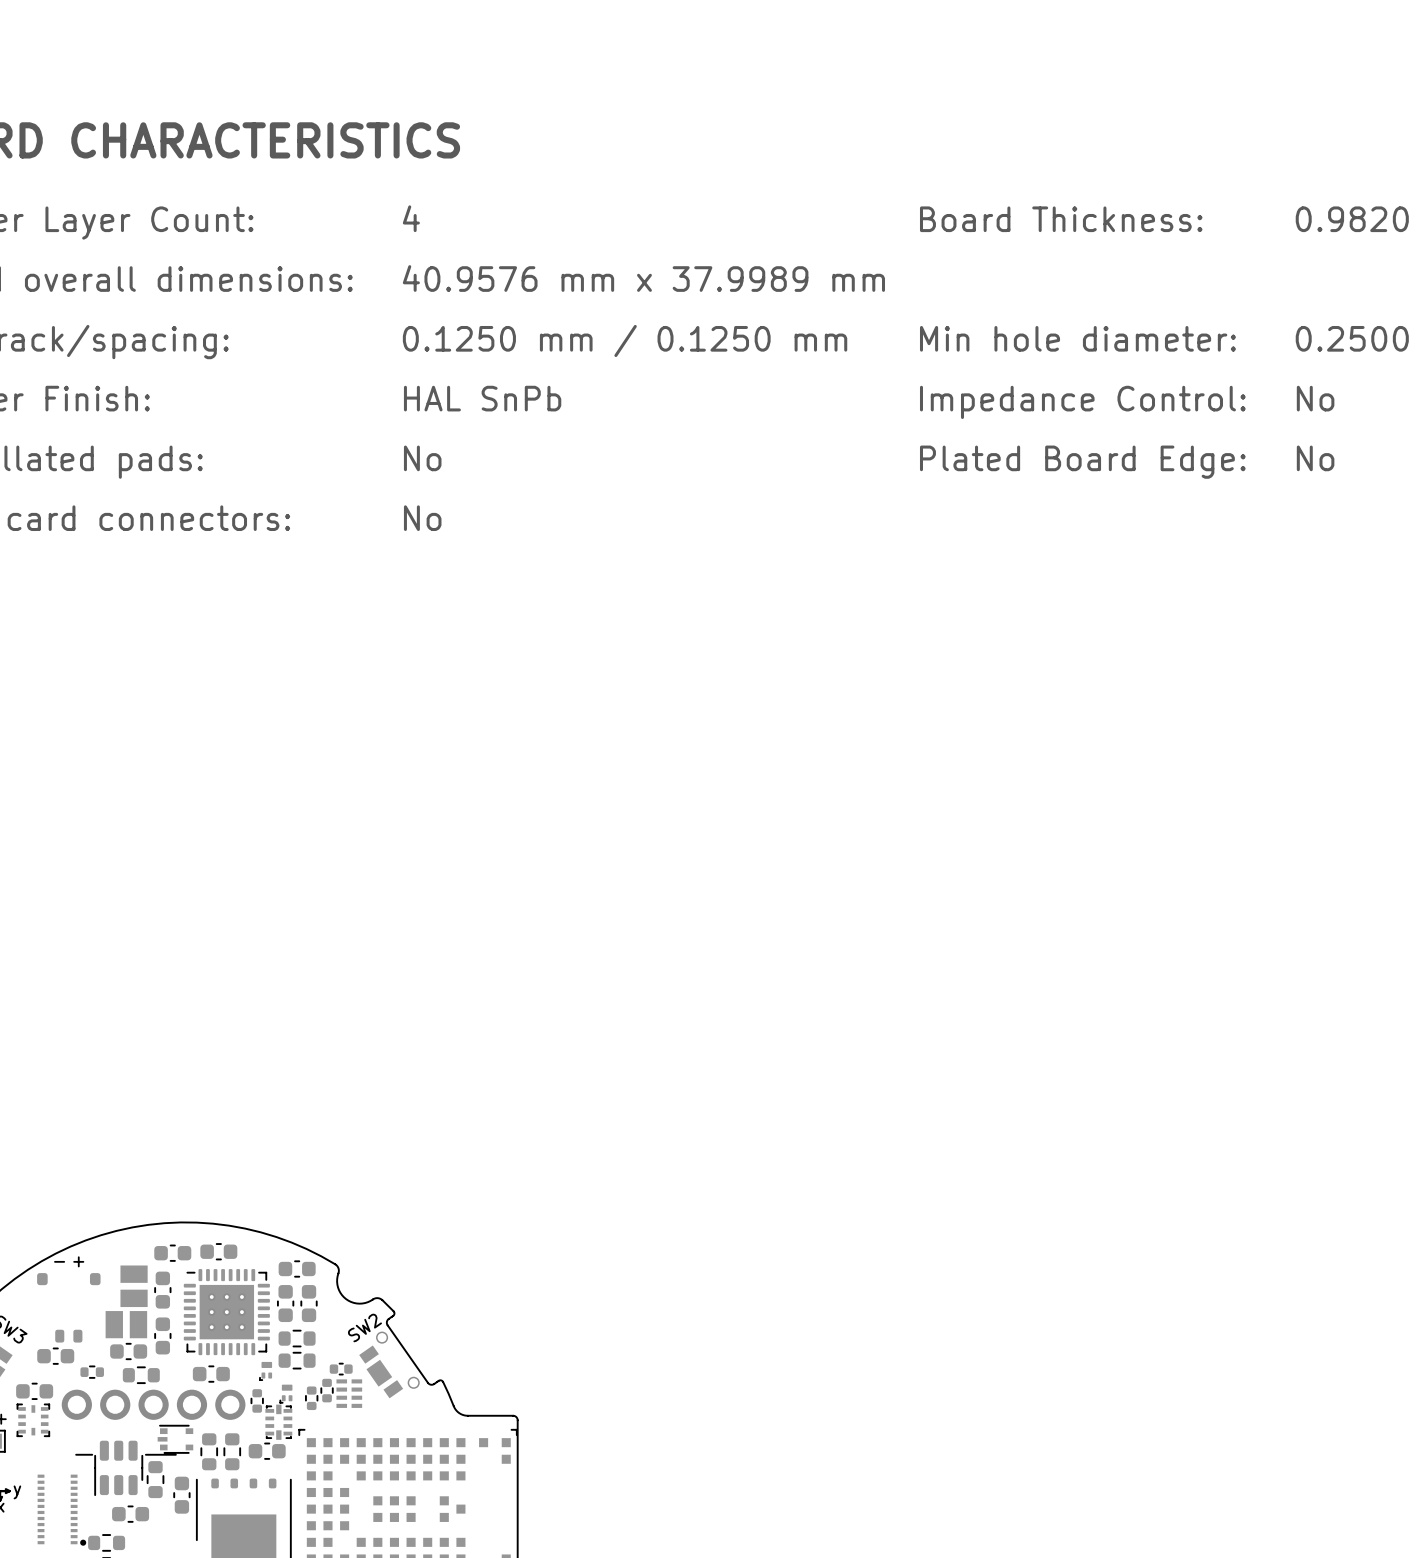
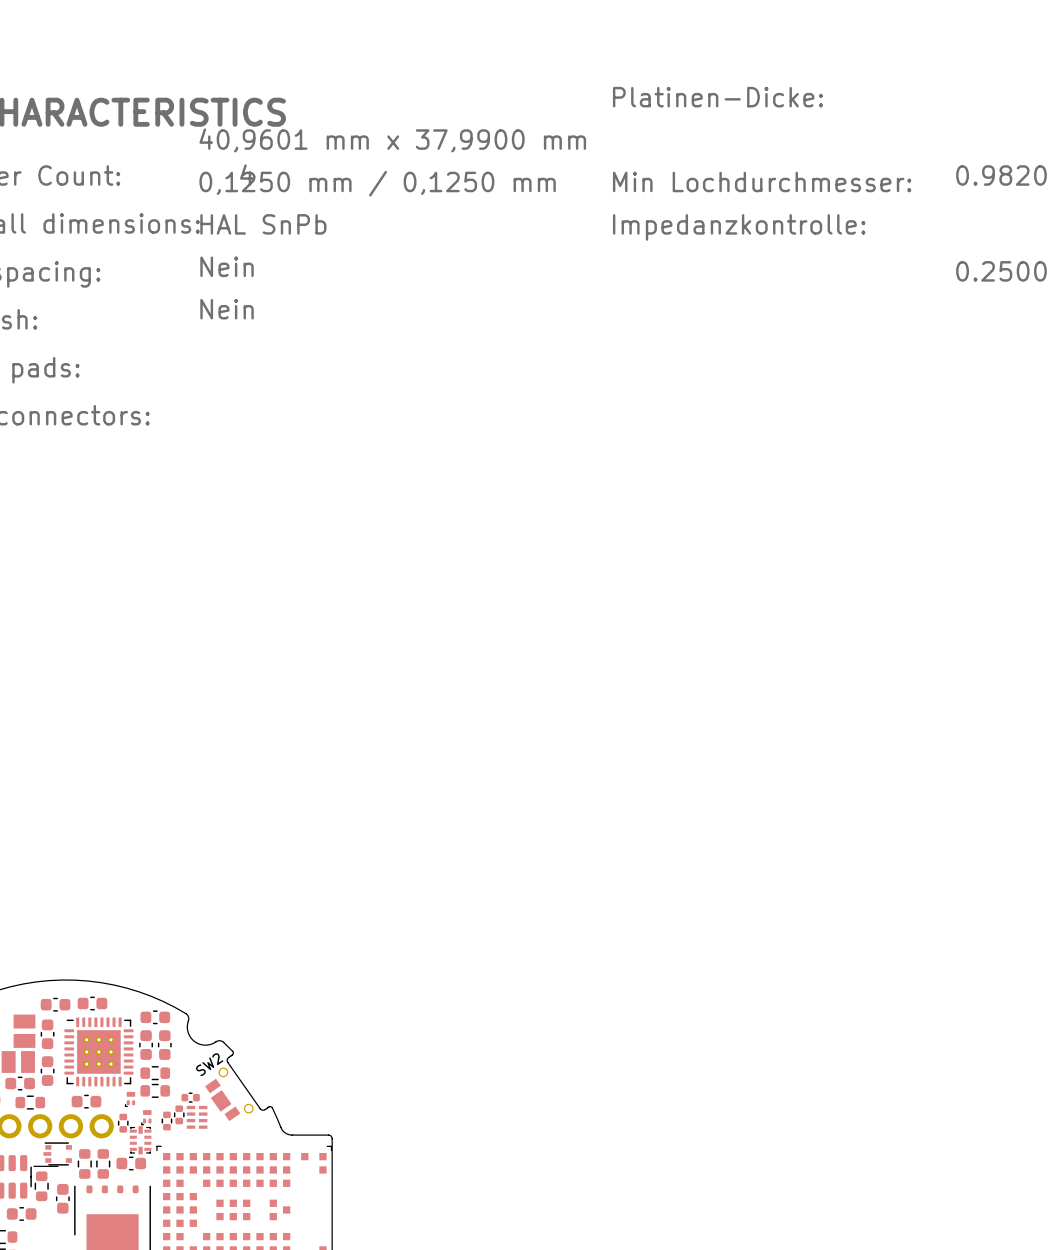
text: none -> Platinen-Dicke: (718, 97)
text: none -> 40,9601 mm x 37,9900 mm (392, 140)
text: Board Thickness: (1061, 219) -> none
text: none -> Min Lochdurchmesser: (762, 181)
text: none -> 0,1250 mm / 0,1250 mm (377, 183)
text: 40.9576 mm x 37.9989 mm (643, 278) -> none
text: none -> Impedanzkontrolle: (739, 227)
text: none -> Nein (227, 266)
text: Min hole diameter: (1077, 338) -> none
text: 0.1250 mm / 0.1250 mm (625, 340) -> none
text: none -> Nein (227, 309)
text position: HAL SnPb (482, 398) -> HAL SnPb (263, 224)
text: No (1315, 398) -> none
text: Impedance Control: (1082, 402) -> none
text: No (422, 458) -> none
text: No (1315, 458) -> none
text: Plated Board Edge: (1082, 462) -> none
text: No (422, 518) -> none

